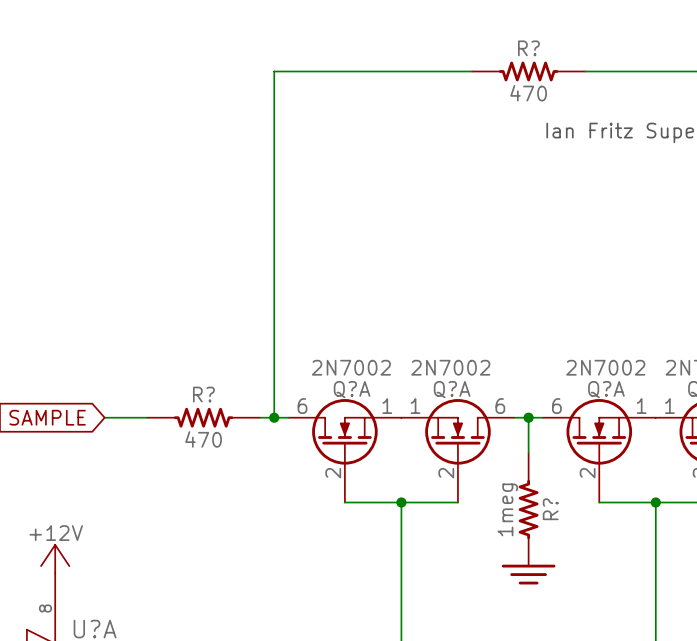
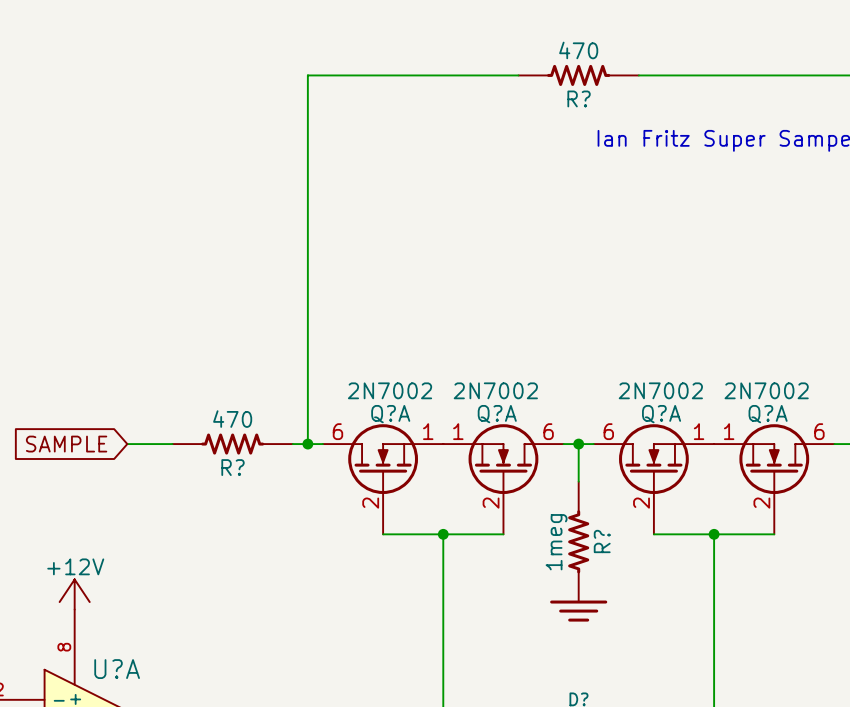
R? rotation: 0° (528, 71) -> 180° (578, 75)
R? rotation: 0° (203, 417) -> 180° (232, 444)

